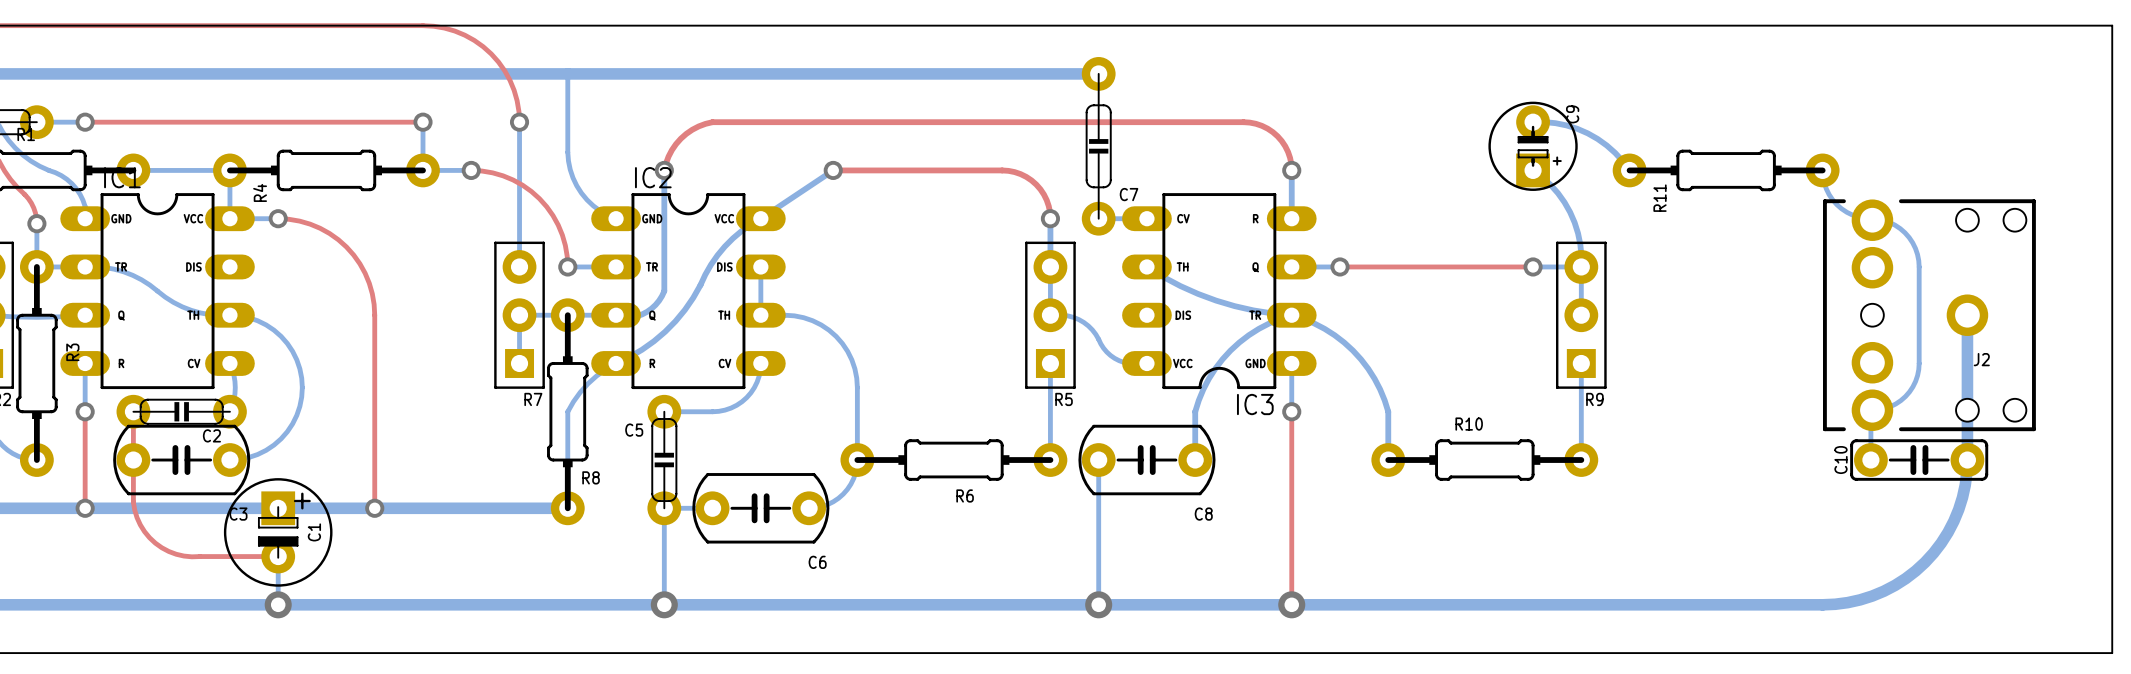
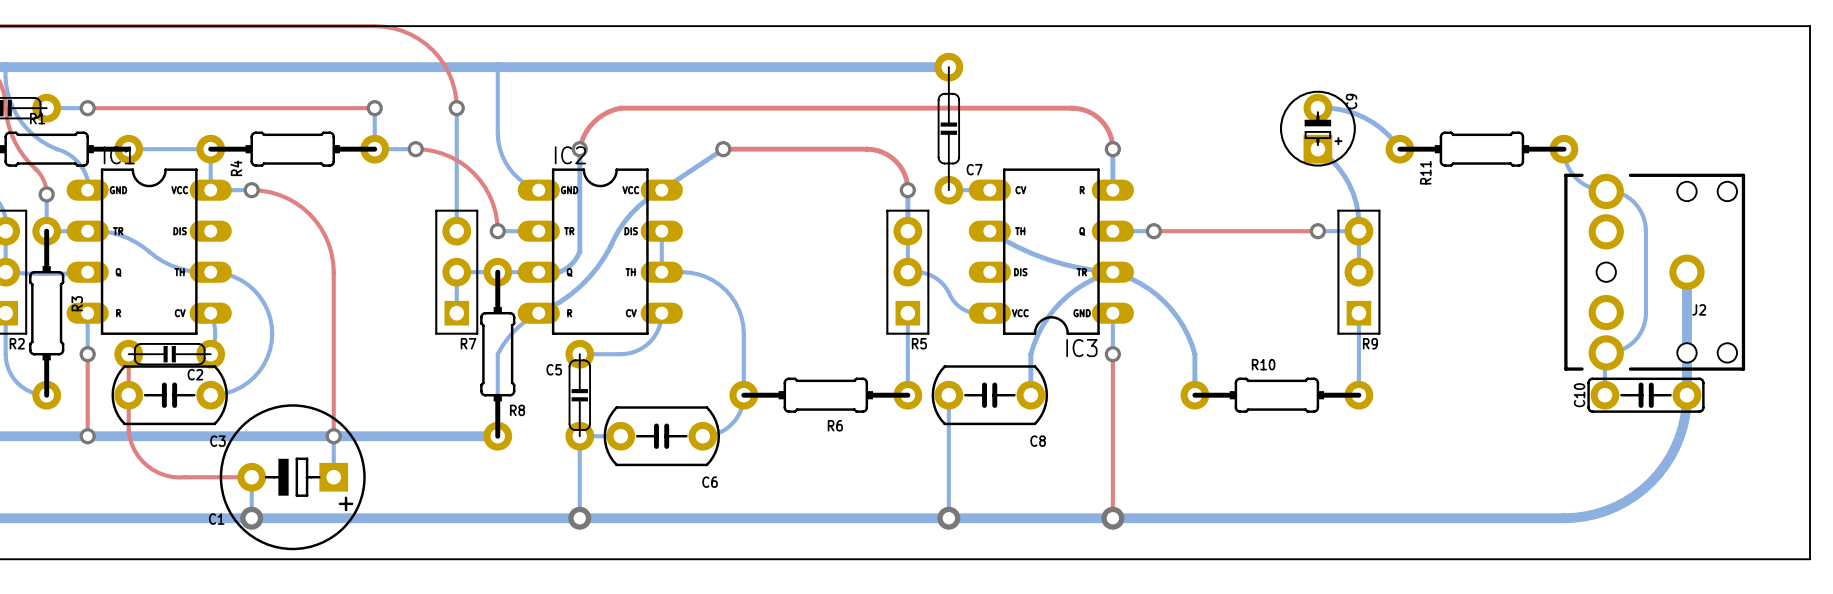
C1 footprint: [223, 478, 333, 587] -> [219, 404, 366, 551]
bottom track: none -> (333, 436) (333, 477)
C1 name position: C1 (314, 532) -> C1 (216, 519)

